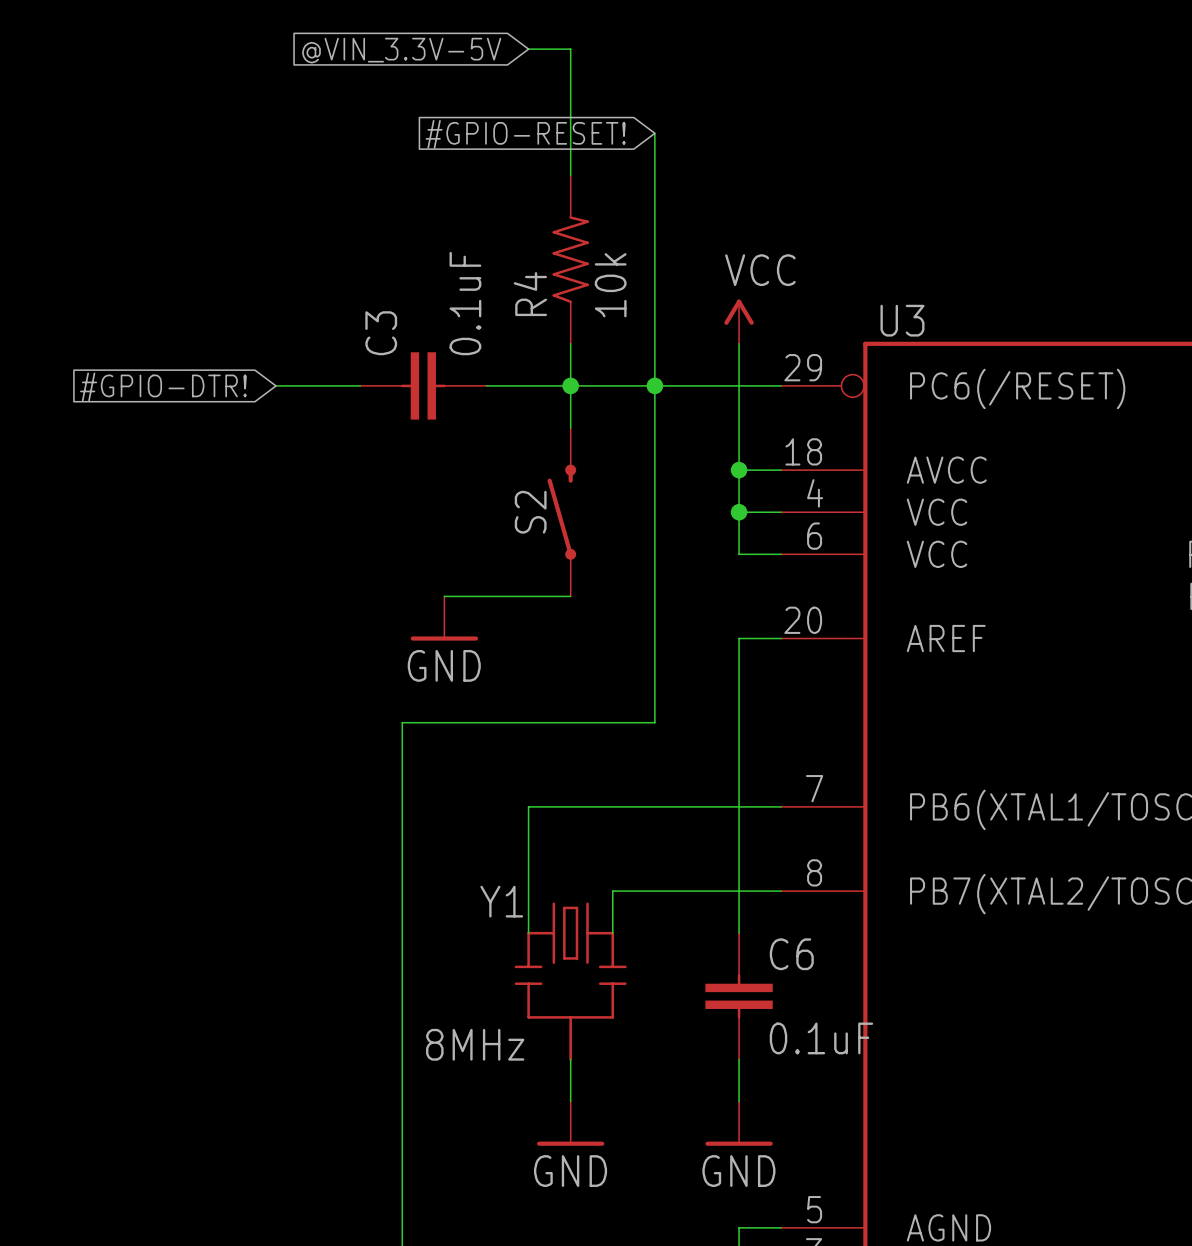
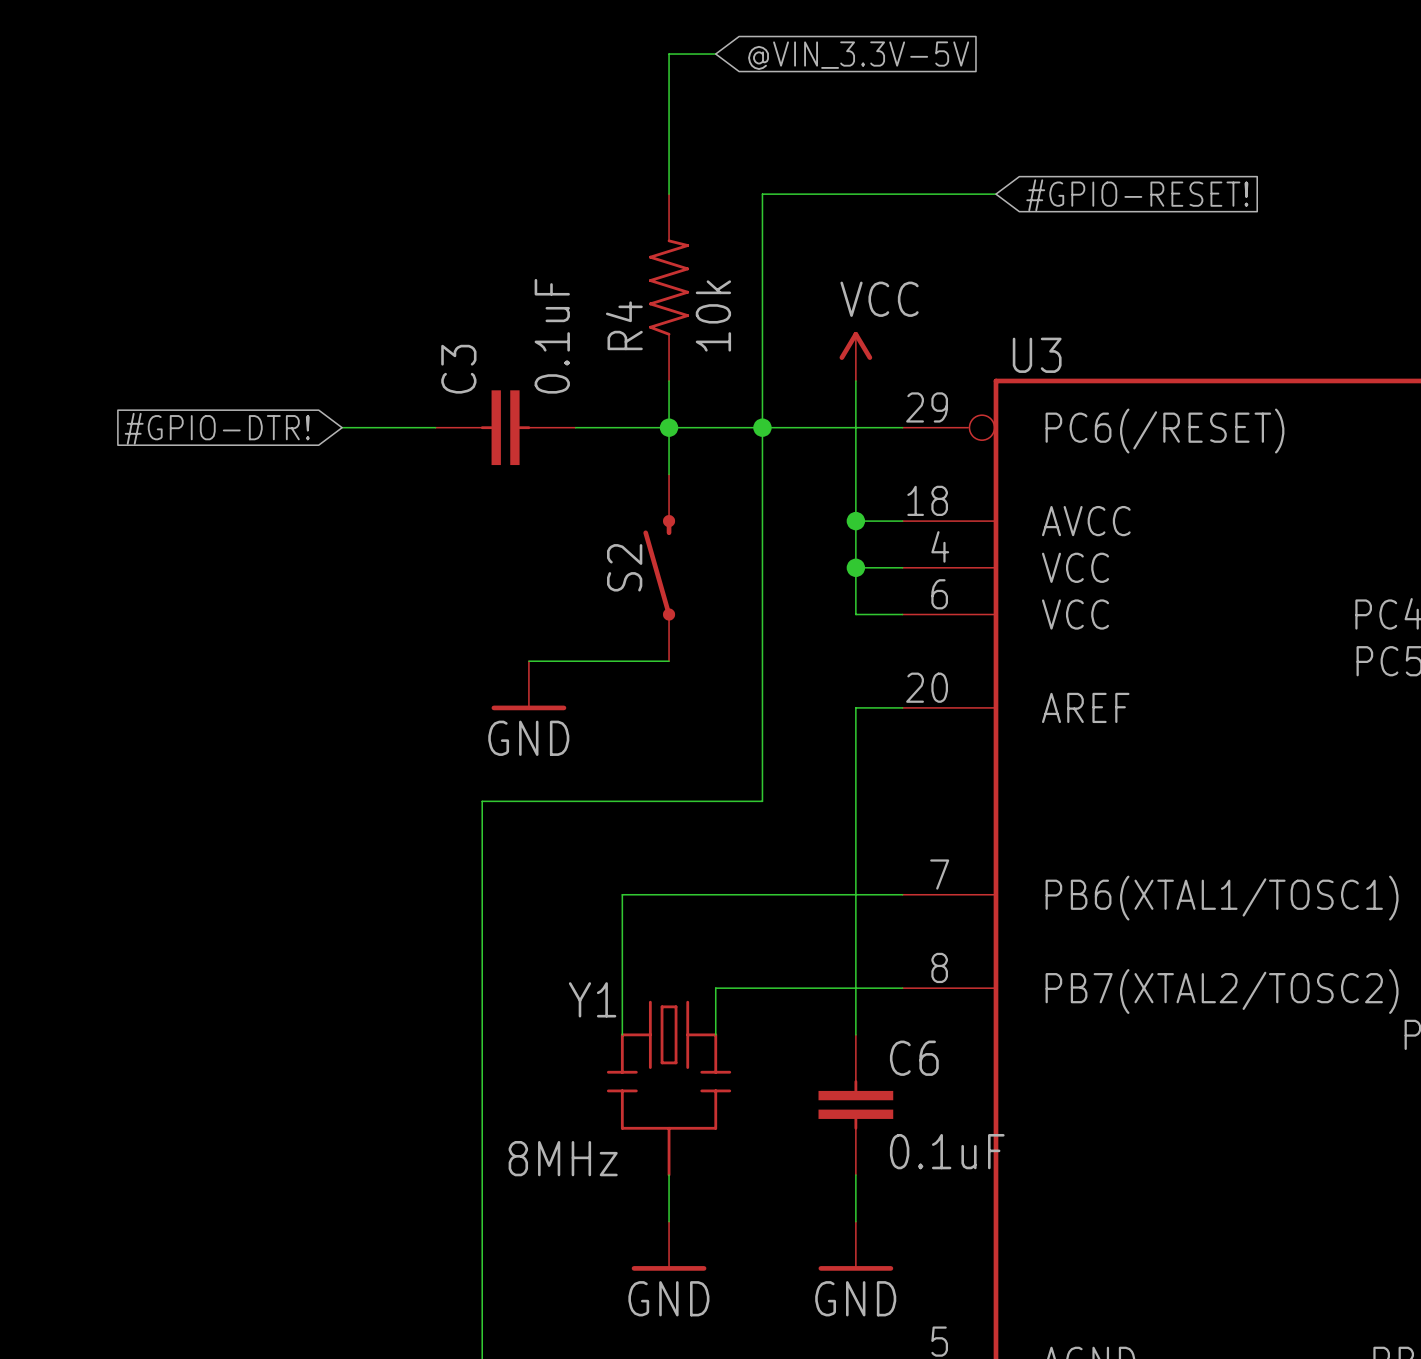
wire: (528, 49) (570, 49) -> (715, 54) (669, 54)
global label rotation: 0° (401, 50) -> 180° (858, 55)
global label position: @VIN_3.3V-5V (401, 50) -> @VIN_3.3V-5V (858, 55)
wire: (654, 133) (654, 175) -> (995, 194) (762, 194)
global label rotation: 0° (525, 134) -> 180° (1137, 195)
global label position: #GPIO-RESET! (525, 134) -> #GPIO-RESET! (1137, 195)

